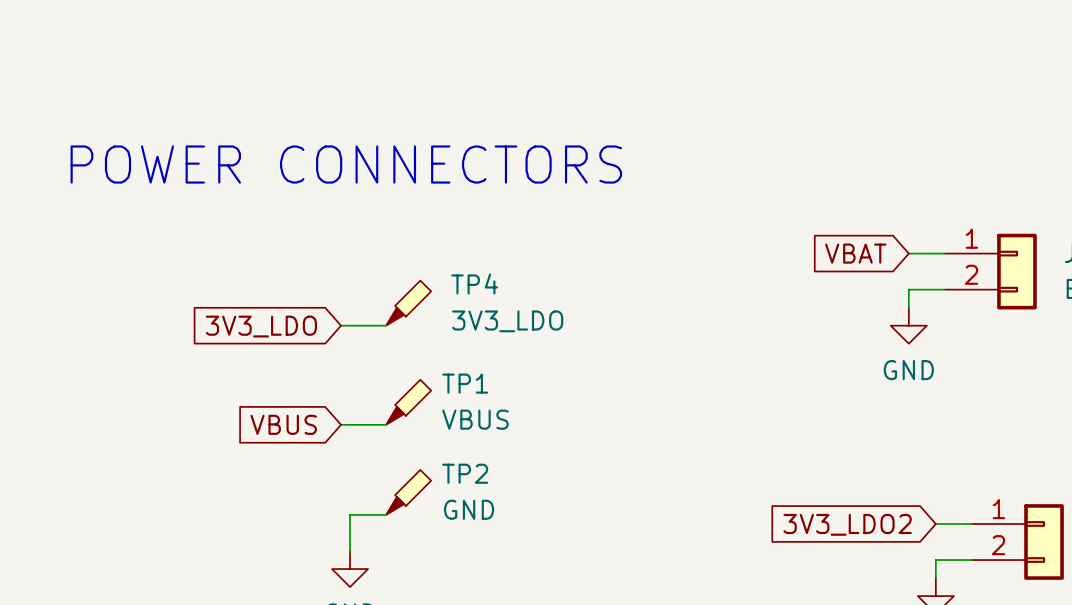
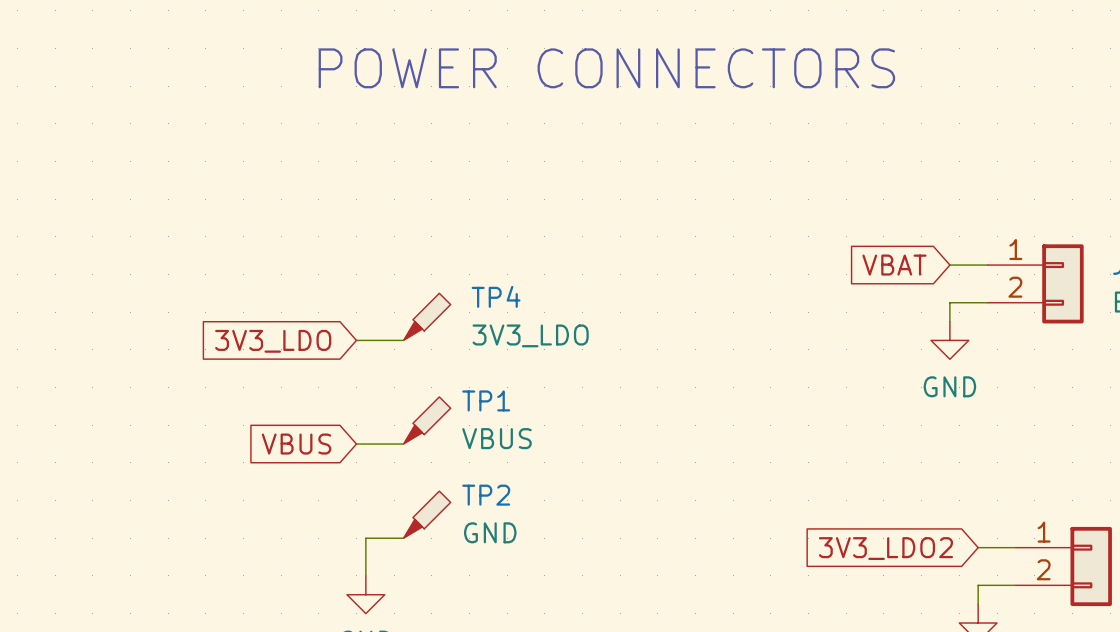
text position: POWER CONNECTORS (346, 164) -> POWER CONNECTORS (606, 68)

